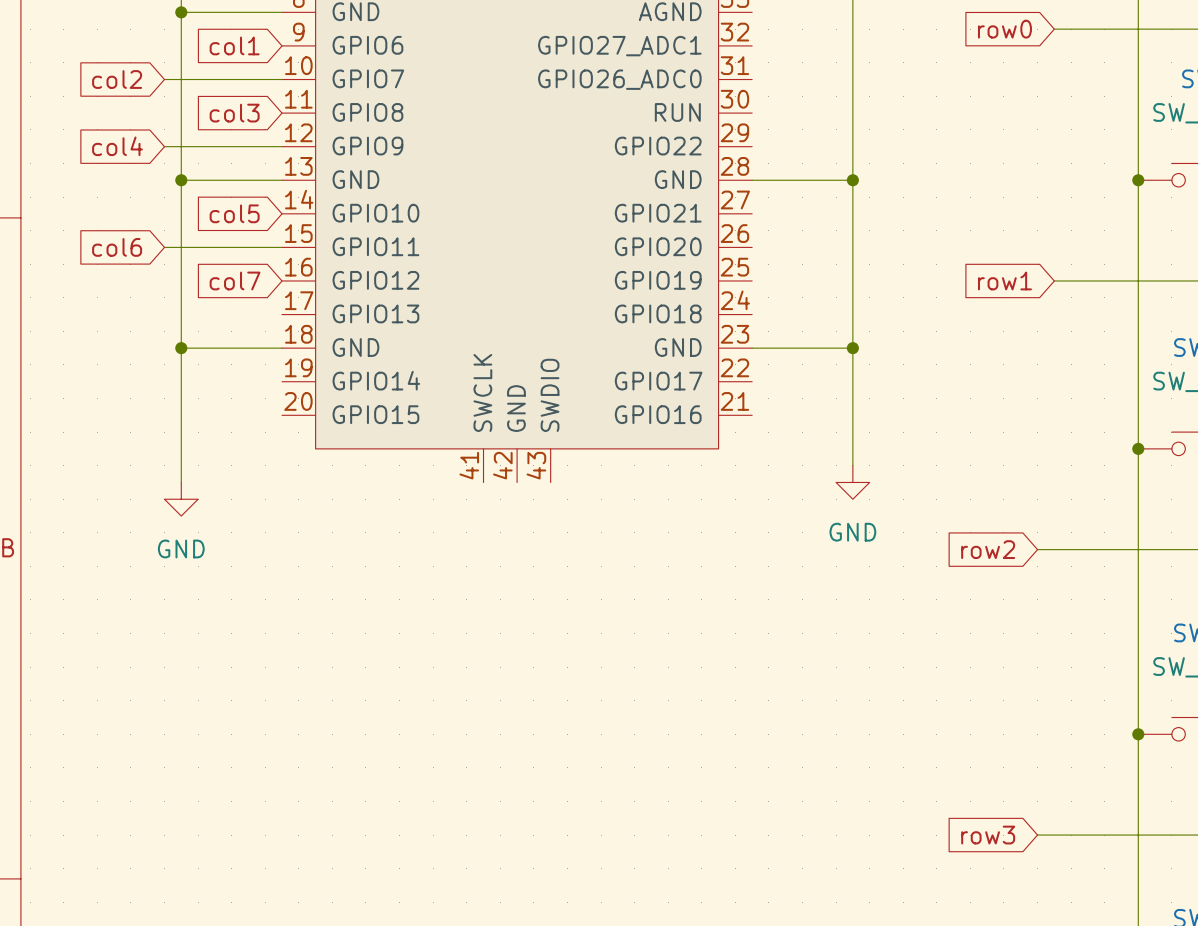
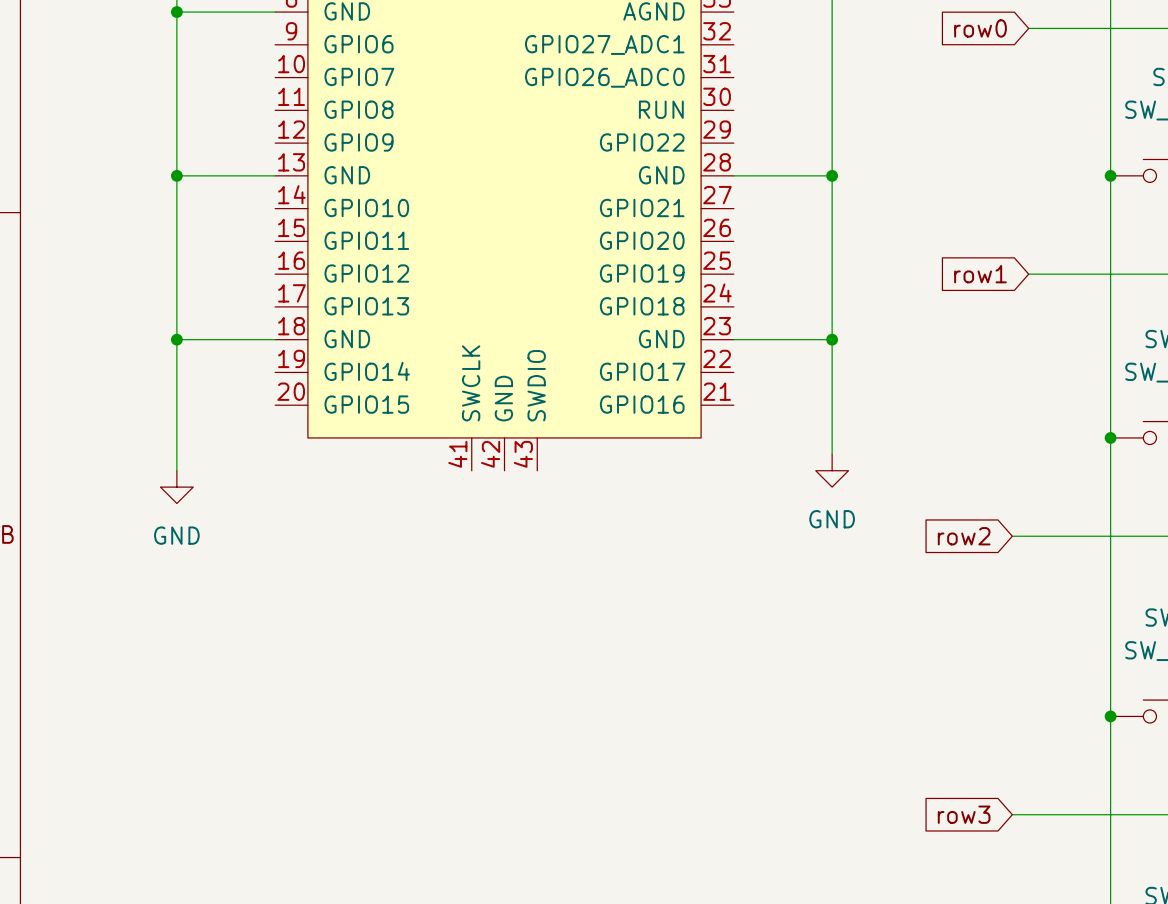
global label: col1 (234, 45) -> none
global label: col2 (117, 79) -> none
wire: (164, 79) (282, 79) -> none
global label: col3 (234, 113) -> none
global label: col4 (117, 146) -> none
wire: (164, 146) (282, 146) -> none
global label: col5 (234, 213) -> none
global label: col6 (117, 247) -> none
wire: (164, 247) (282, 247) -> none
global label: col7 (235, 280) -> none

